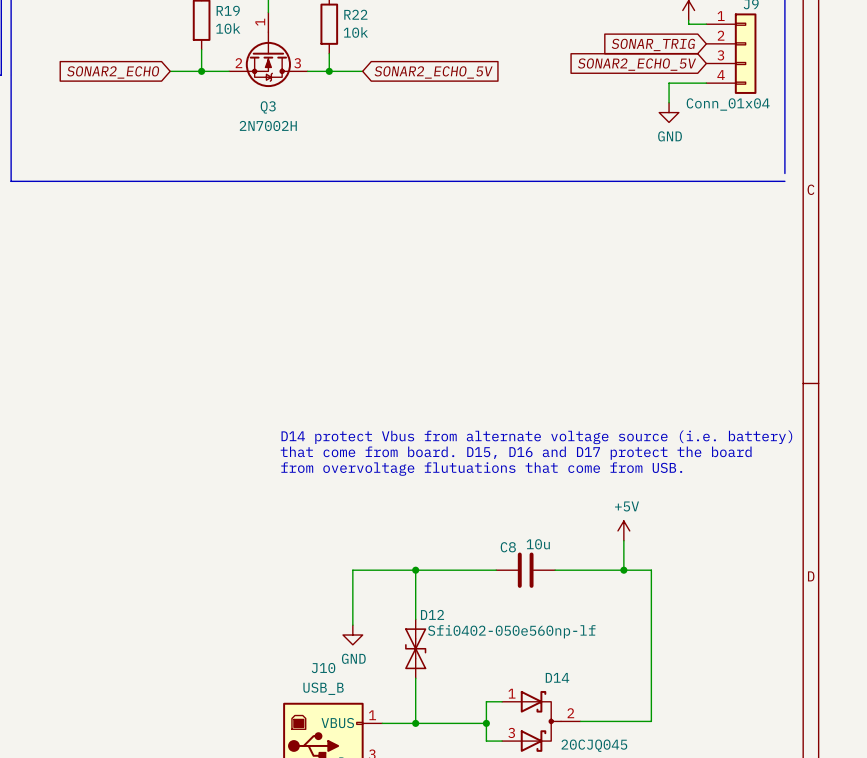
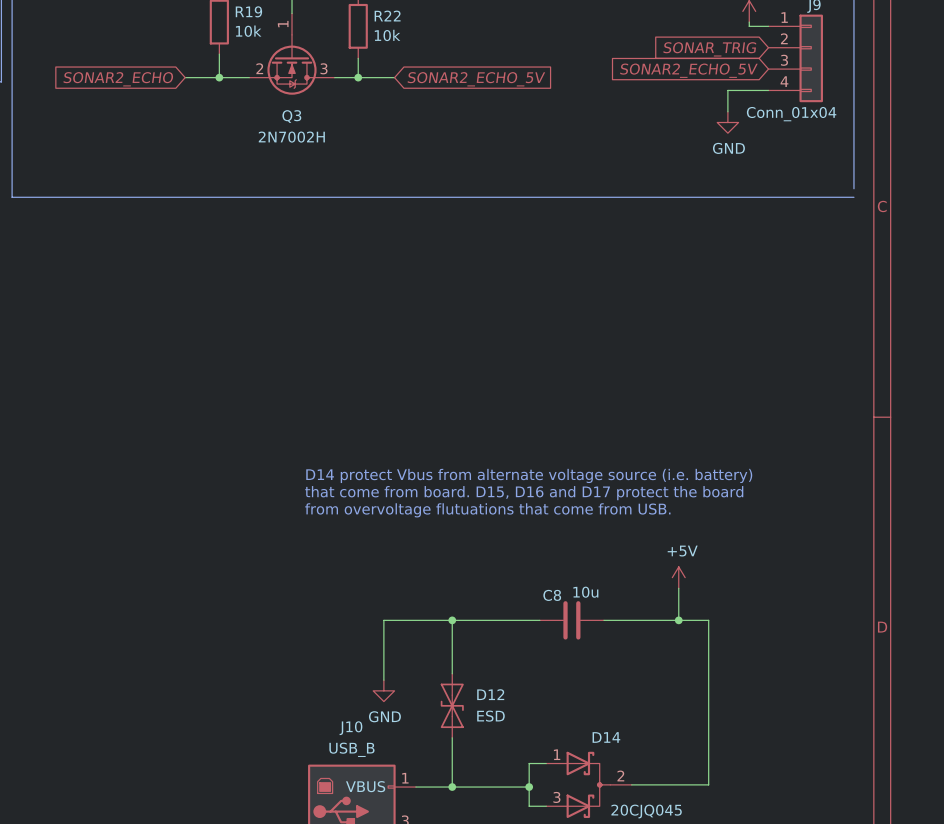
D12 name position: D12 (432, 614) -> D12 (490, 694)
D12 value: Sfi0402-050e560np-lf (511, 631) -> ESD (490, 716)

